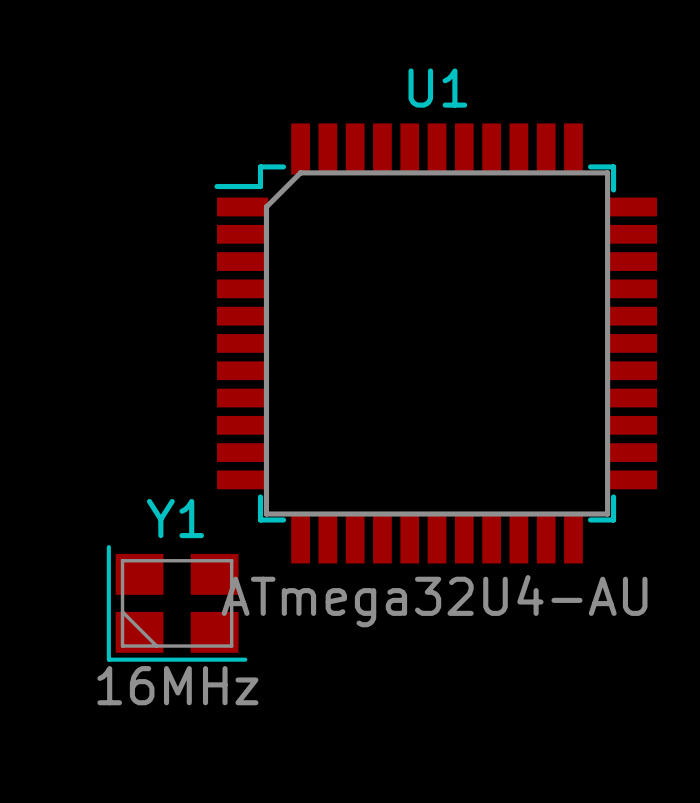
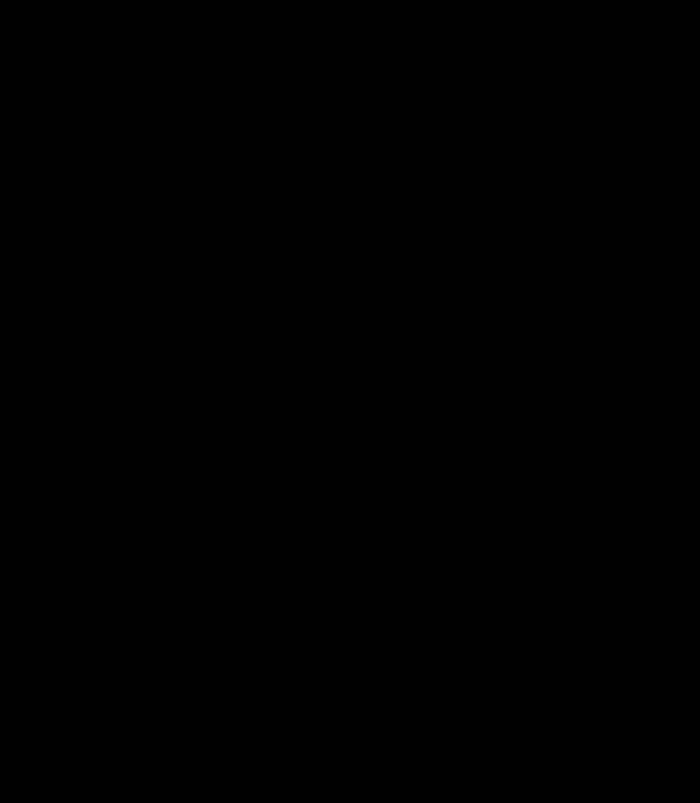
U1: ATmega32U4-AU (435, 343) -> none
Y1: 16MHz (177, 603) -> none

